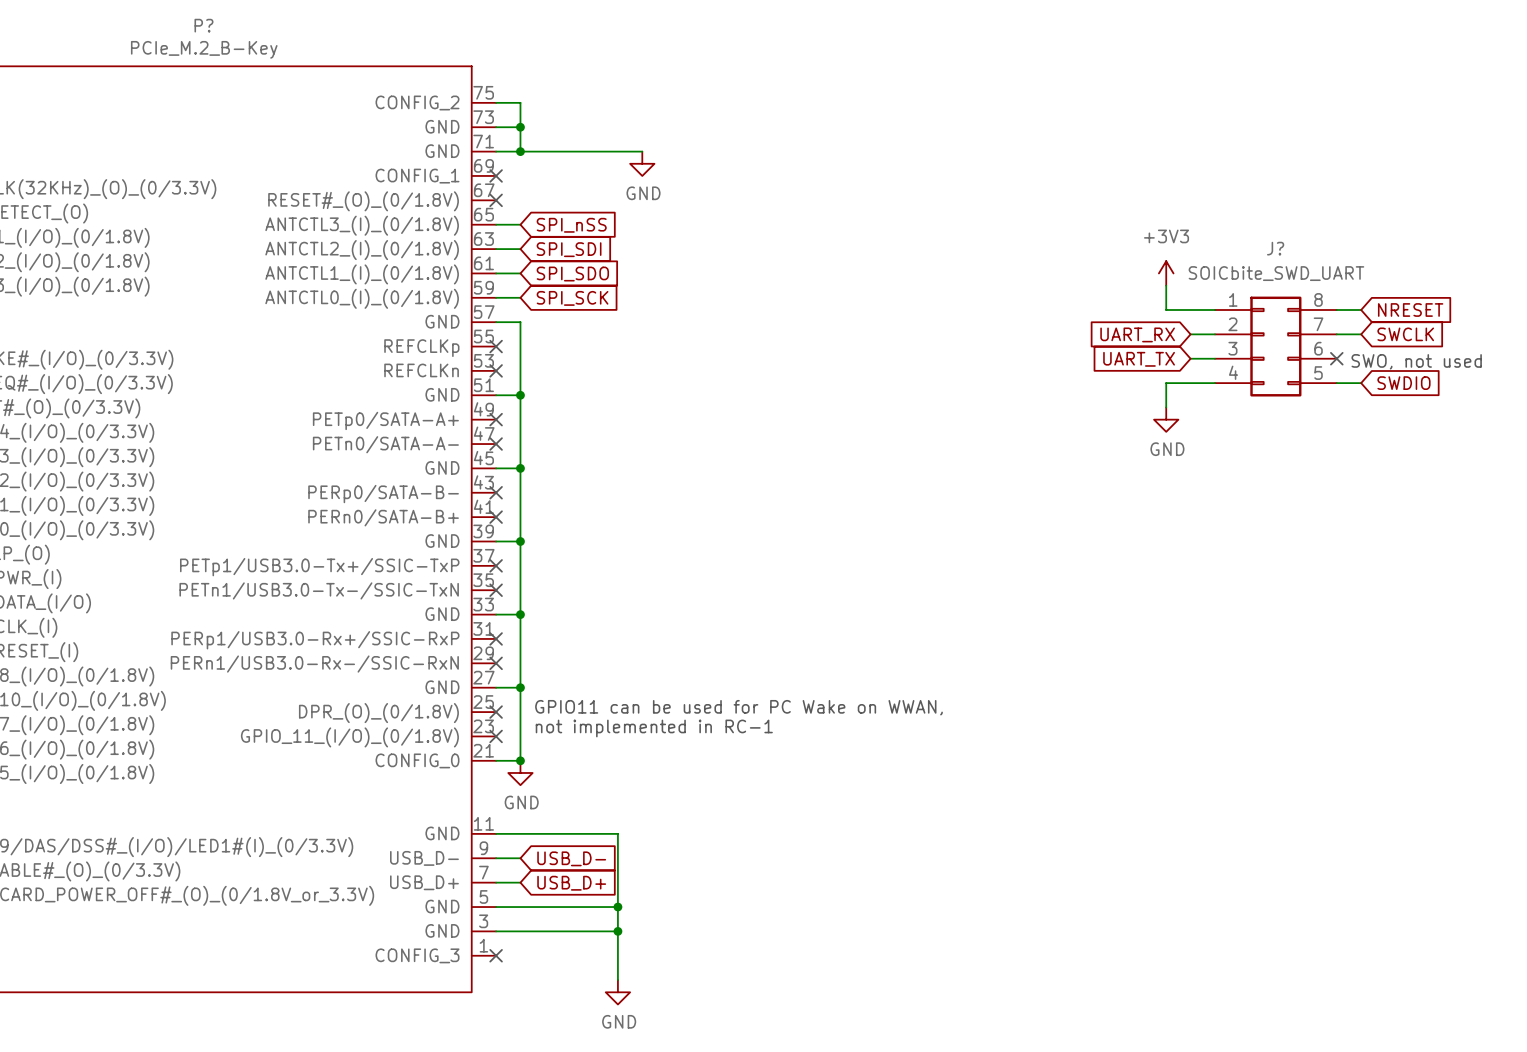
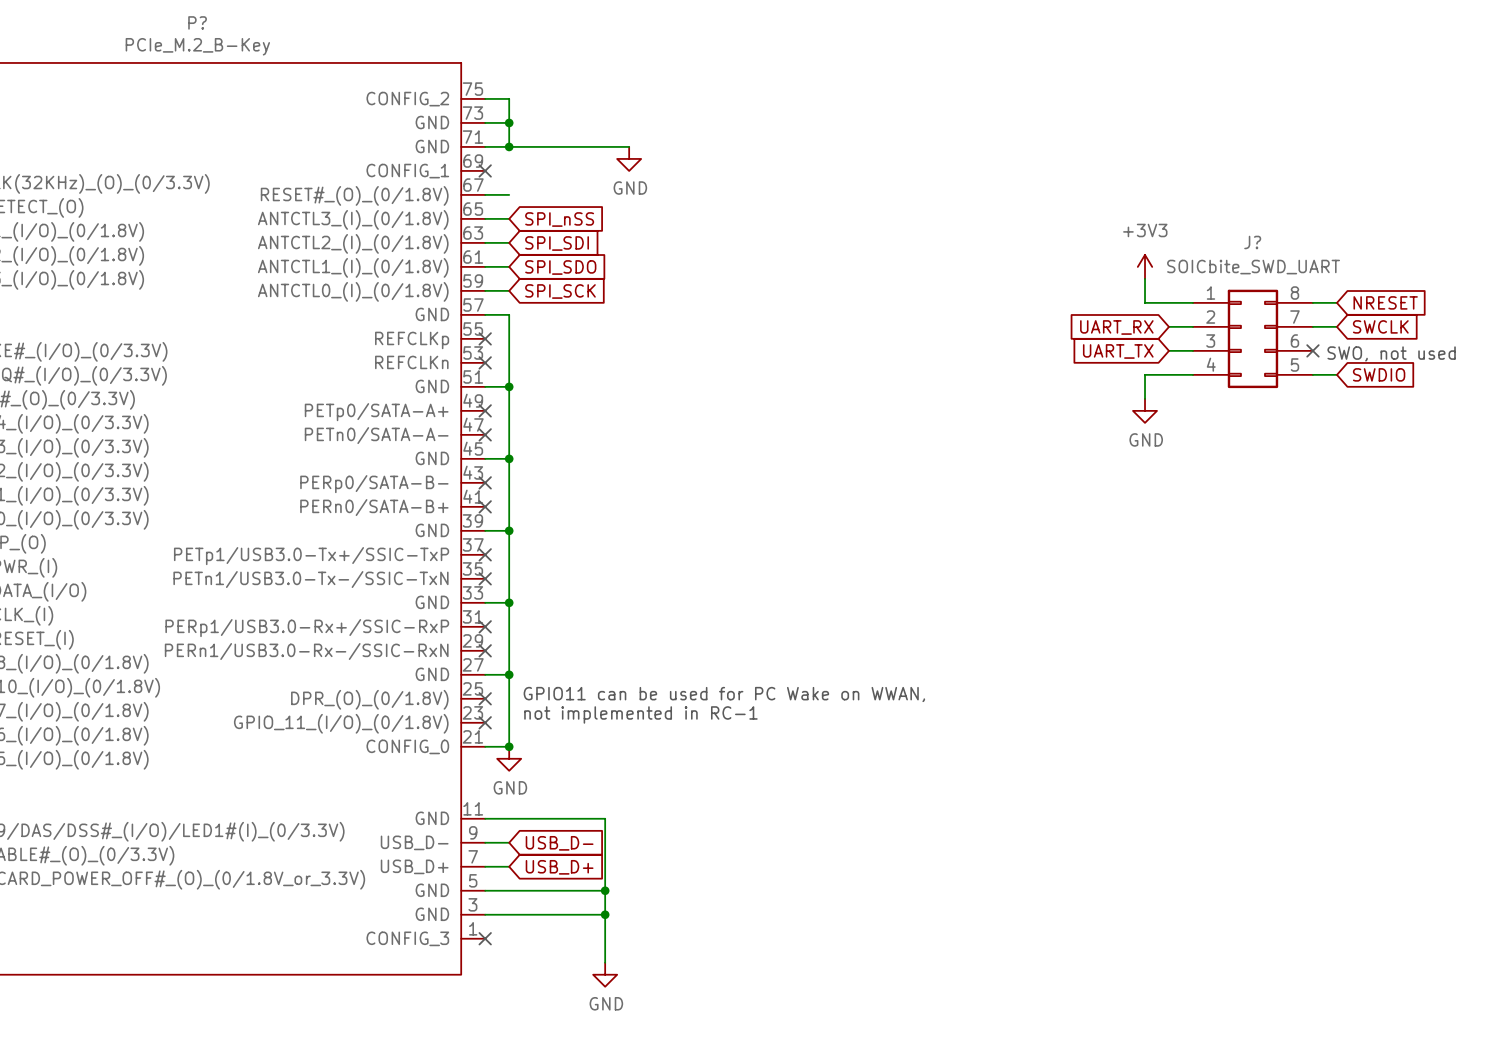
wire: none -> (485, 194) (509, 194)
no-connect mark: (496, 200) -> none

